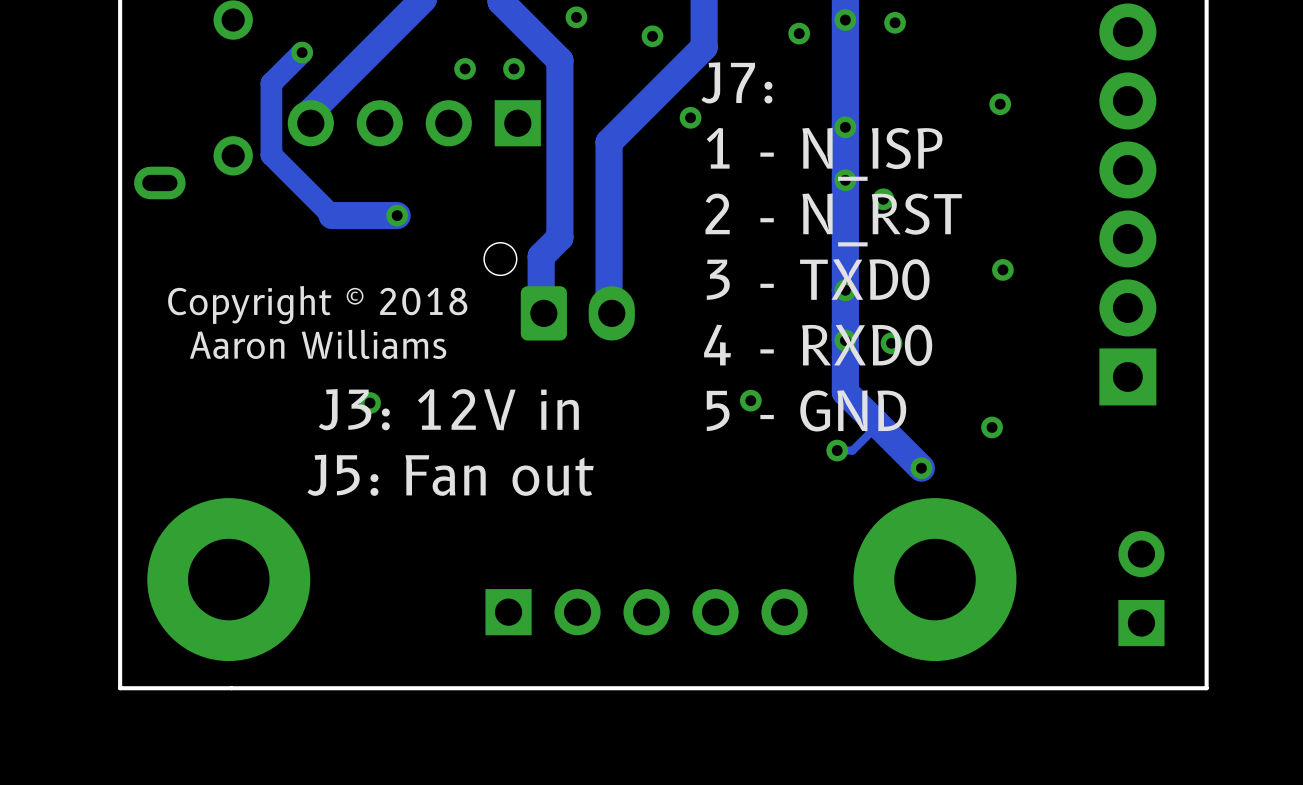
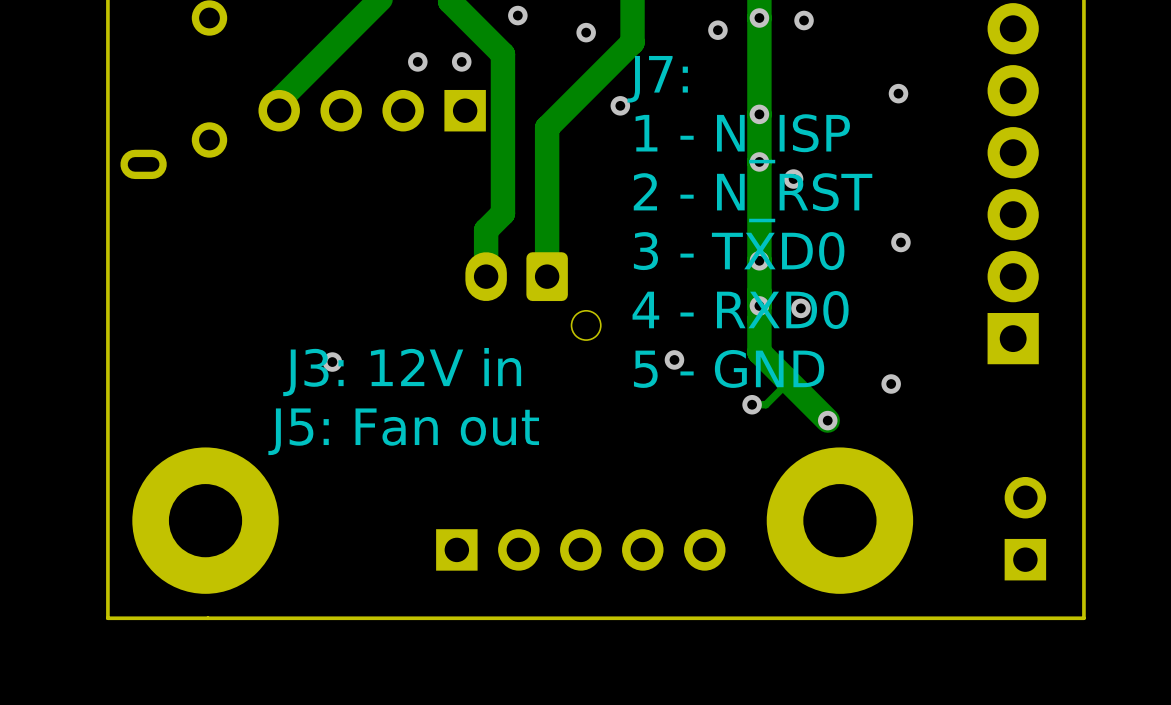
track: (302, 52) (271, 83) (271, 155) (332, 215) (397, 215) -> none
via: (302, 52) -> none
via: (397, 215) -> none
part rotation: 0° (559, 291) -> 180° (533, 296)
text: Copyright © 2018 (317, 305) -> none
text: Aaron Williams (318, 344) -> none

